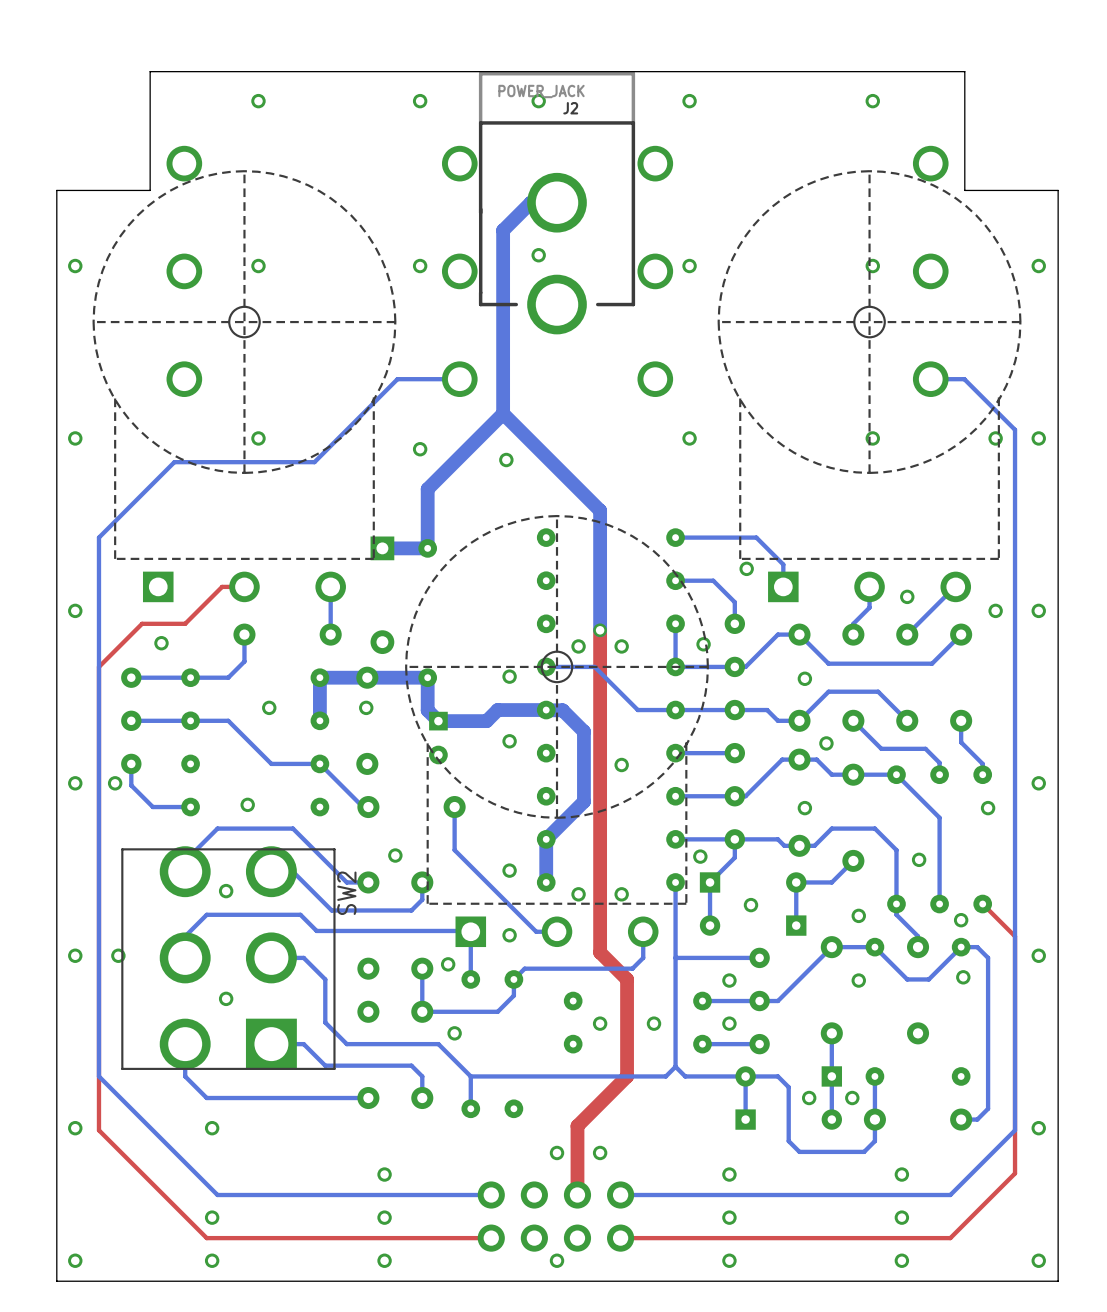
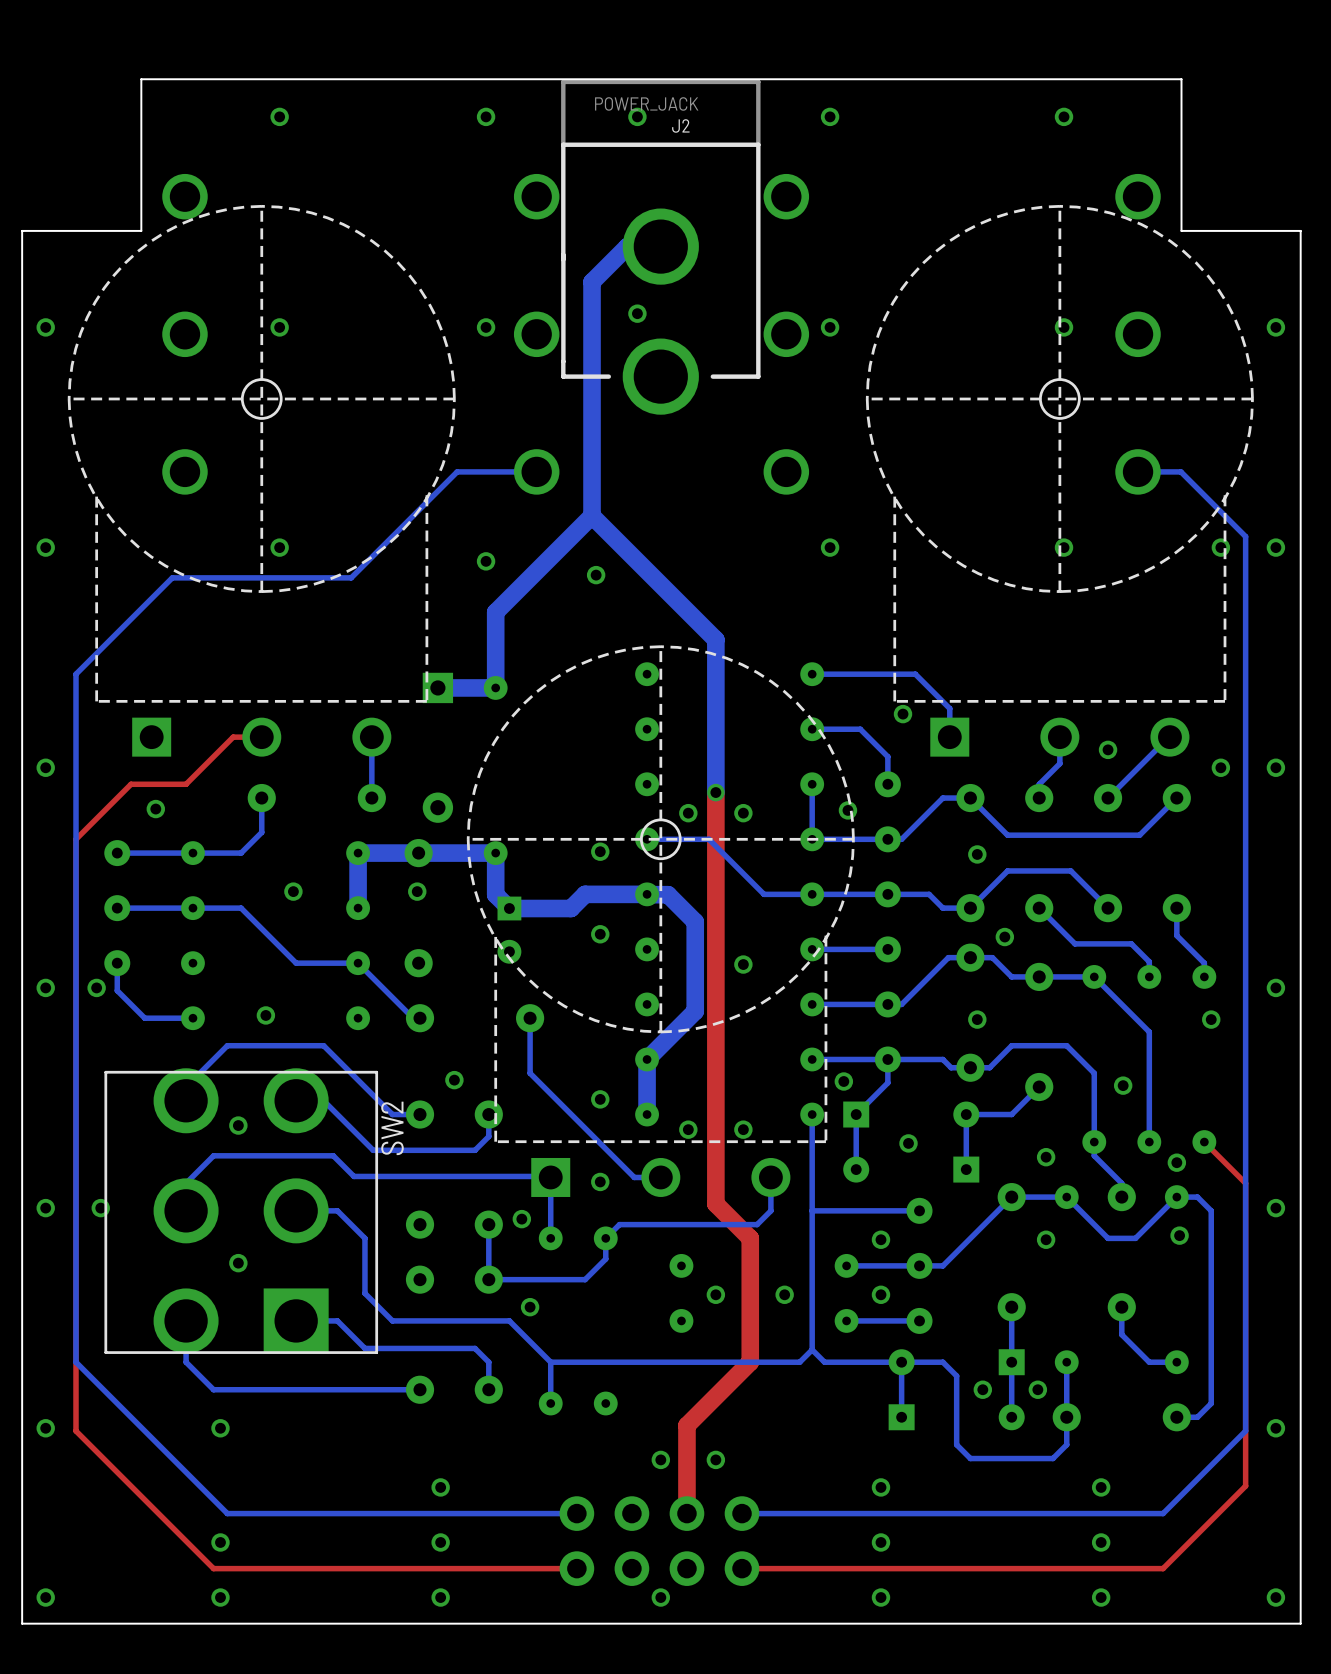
bottom track: none -> (1121, 1307) (1121, 1334) (1149, 1362) (1176, 1362)

